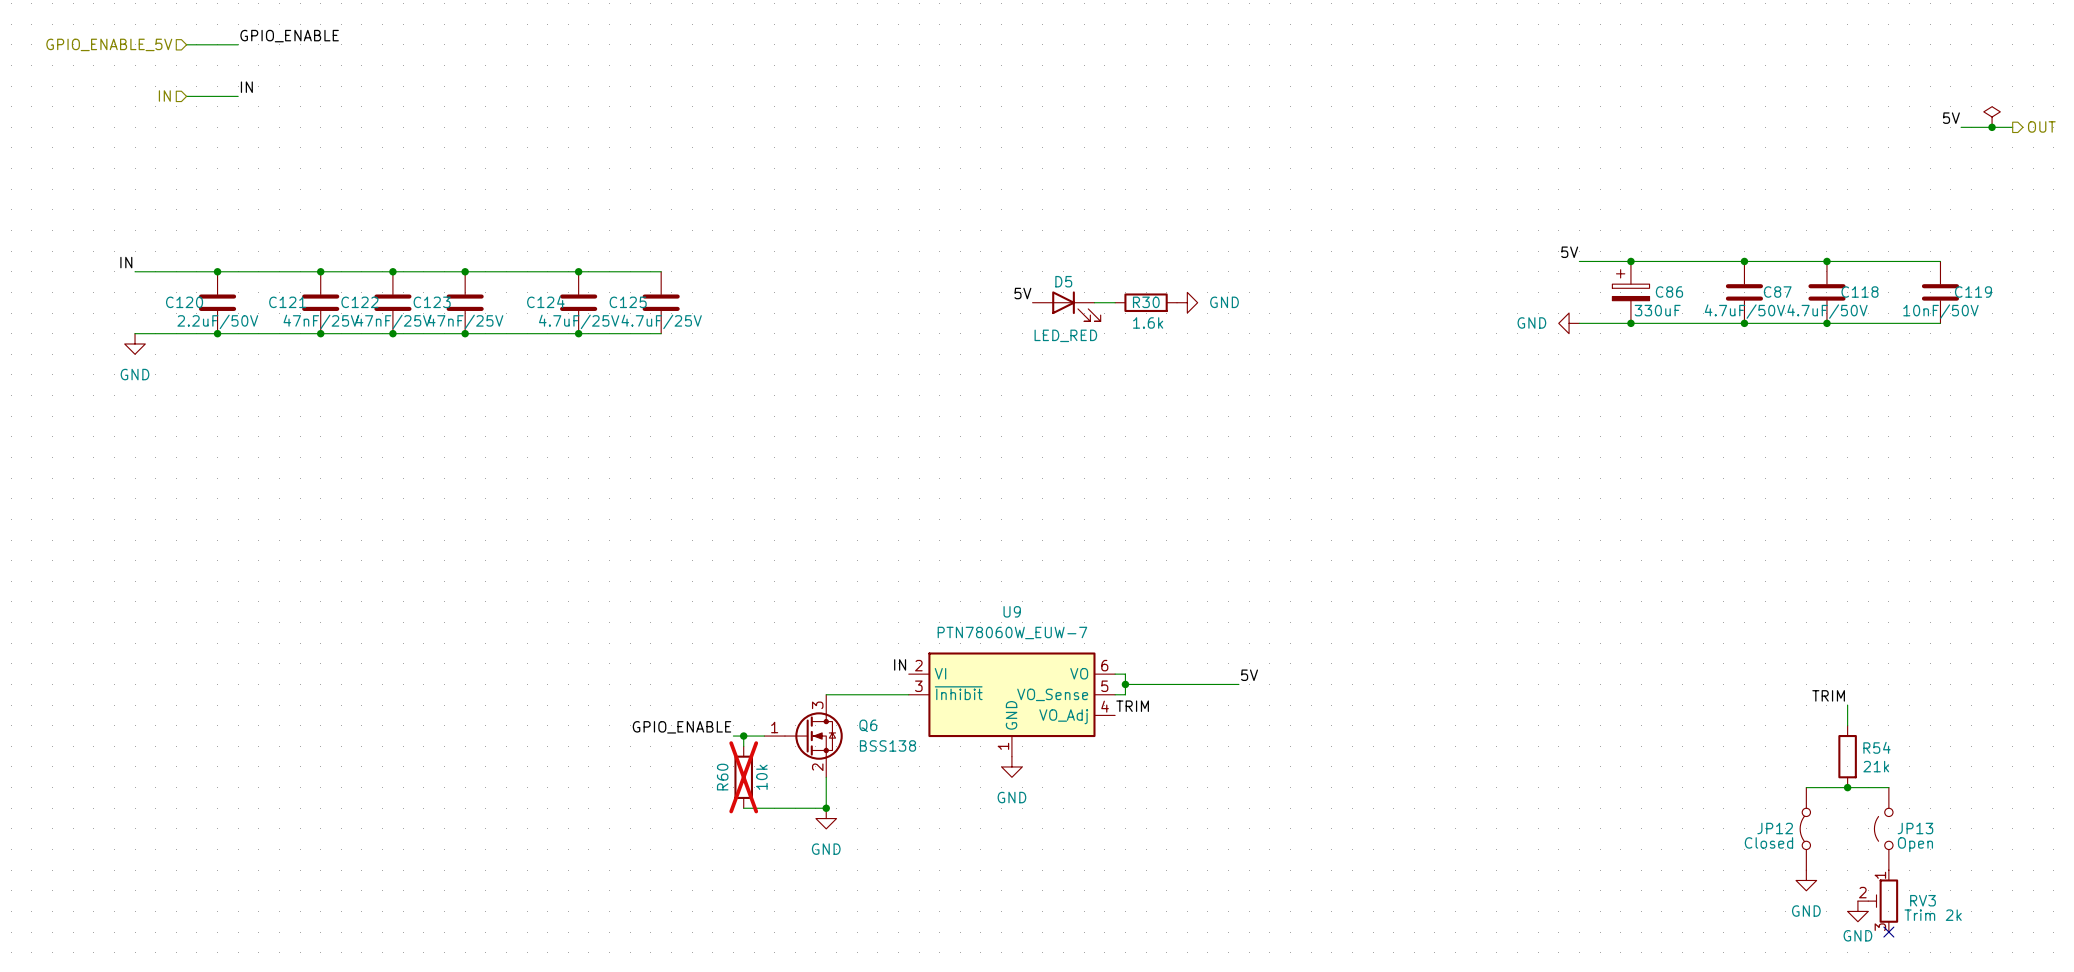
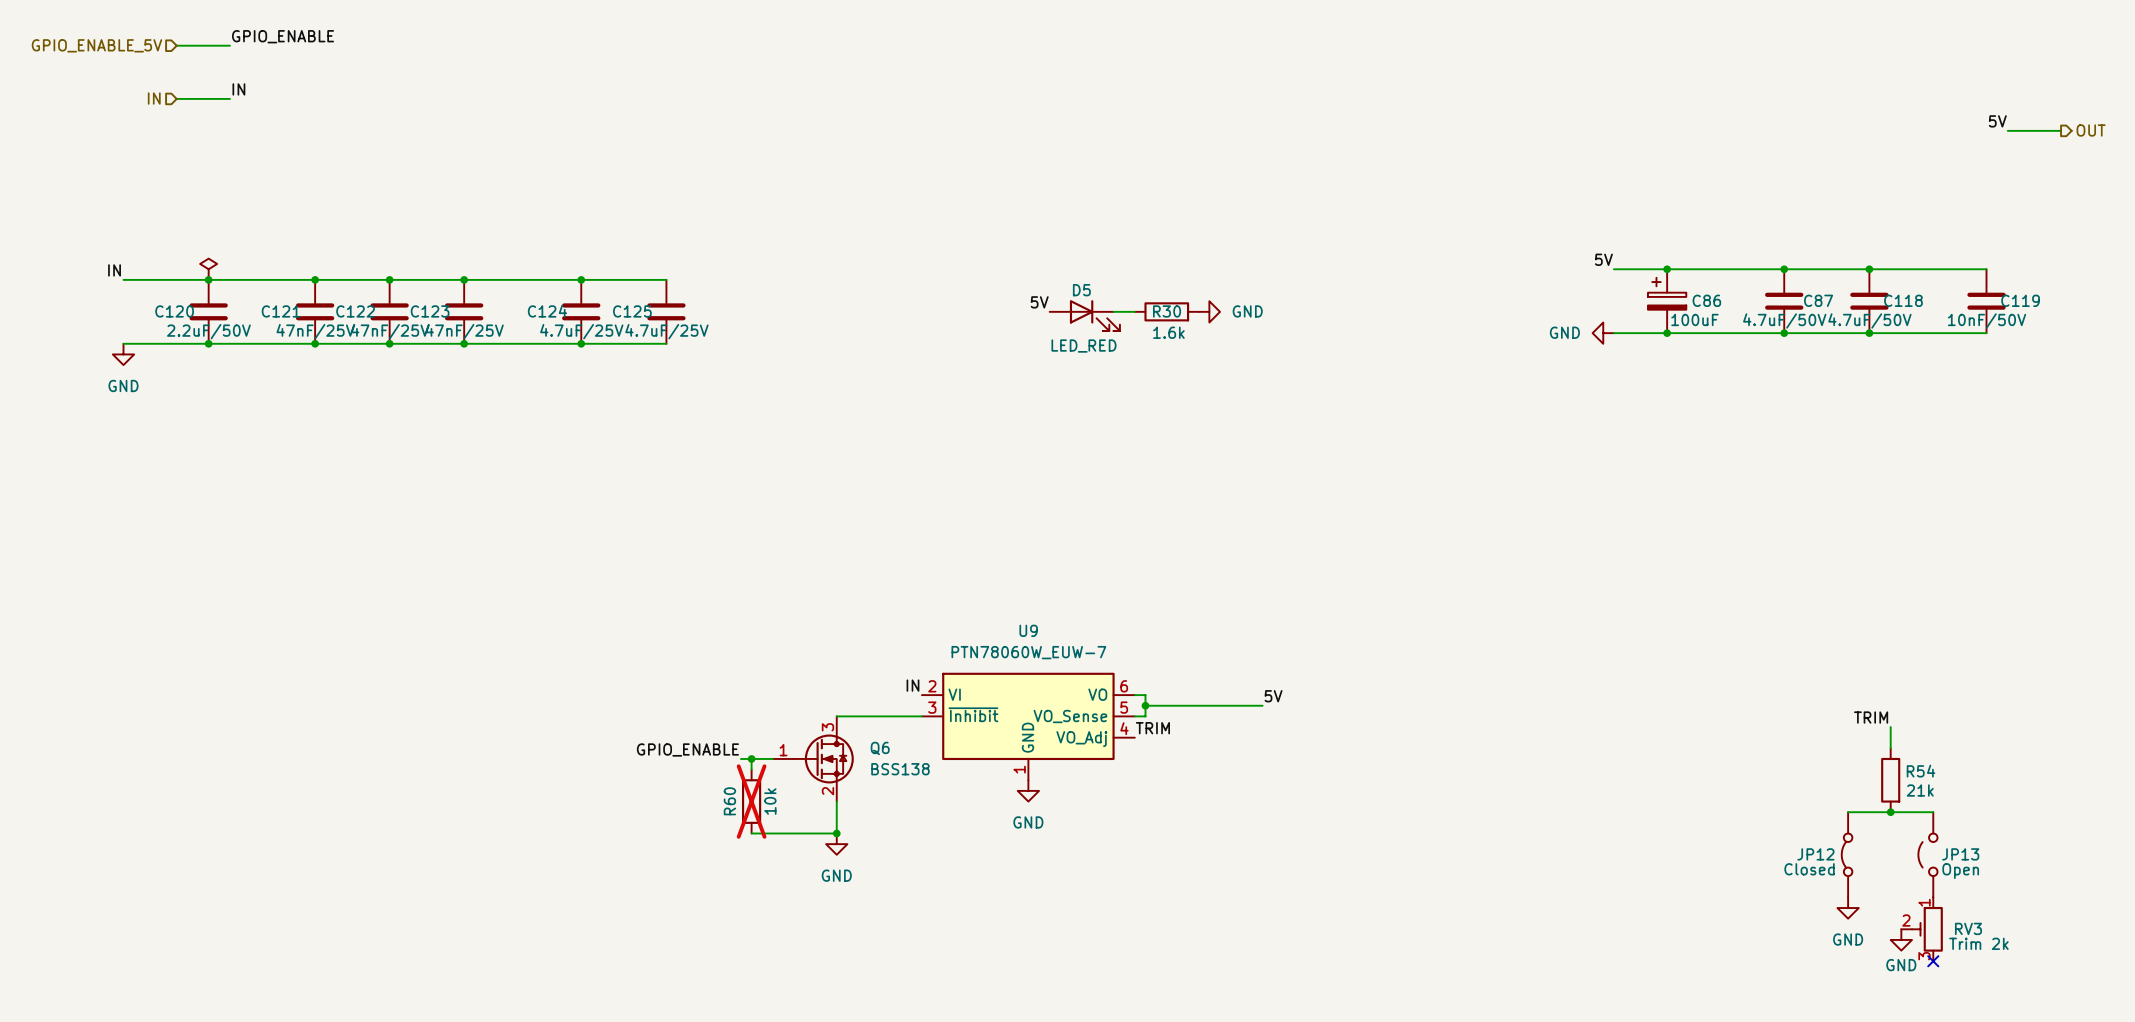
power symbol: (1992, 117) -> none
junction: (1992, 127) -> none
power symbol: none -> (208, 269)
C86 value: 330uF (1657, 310) -> 100uF (1694, 319)

